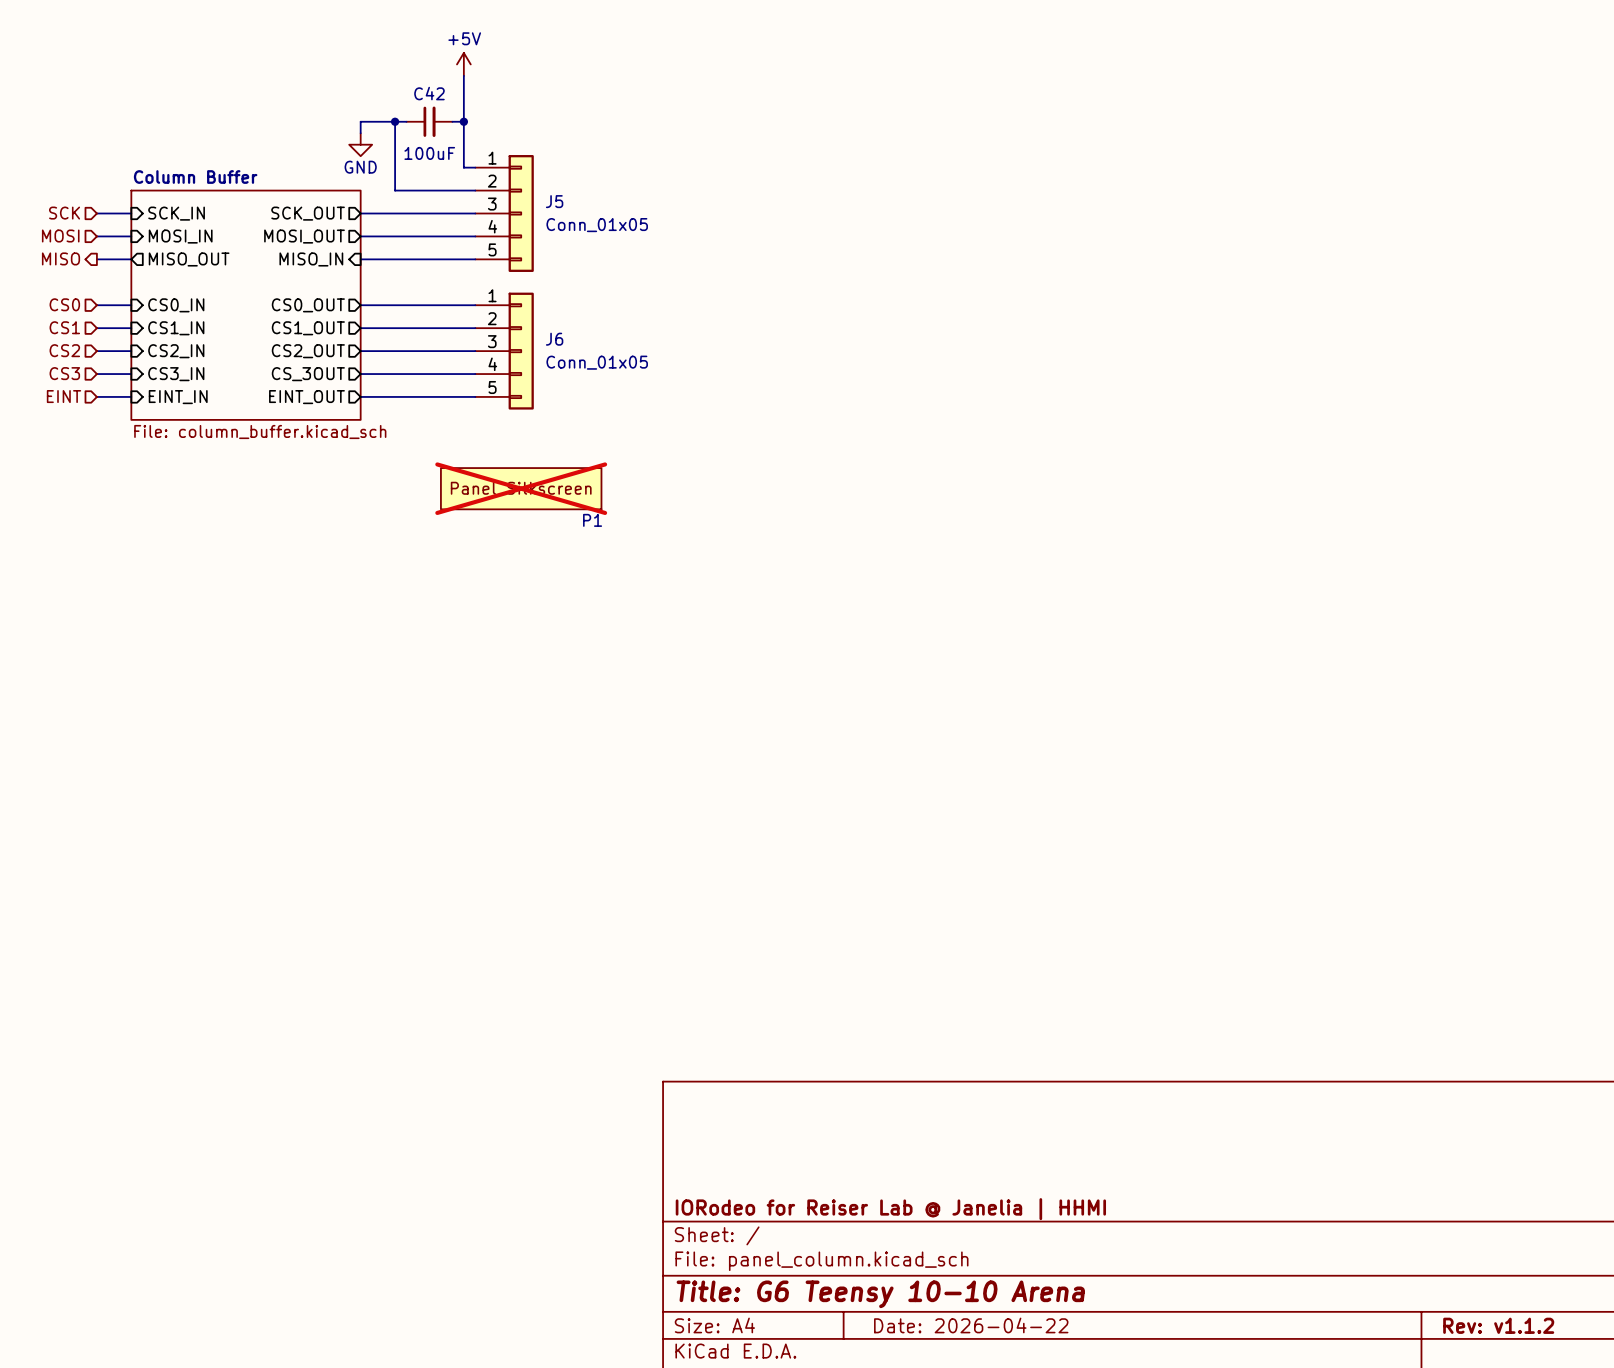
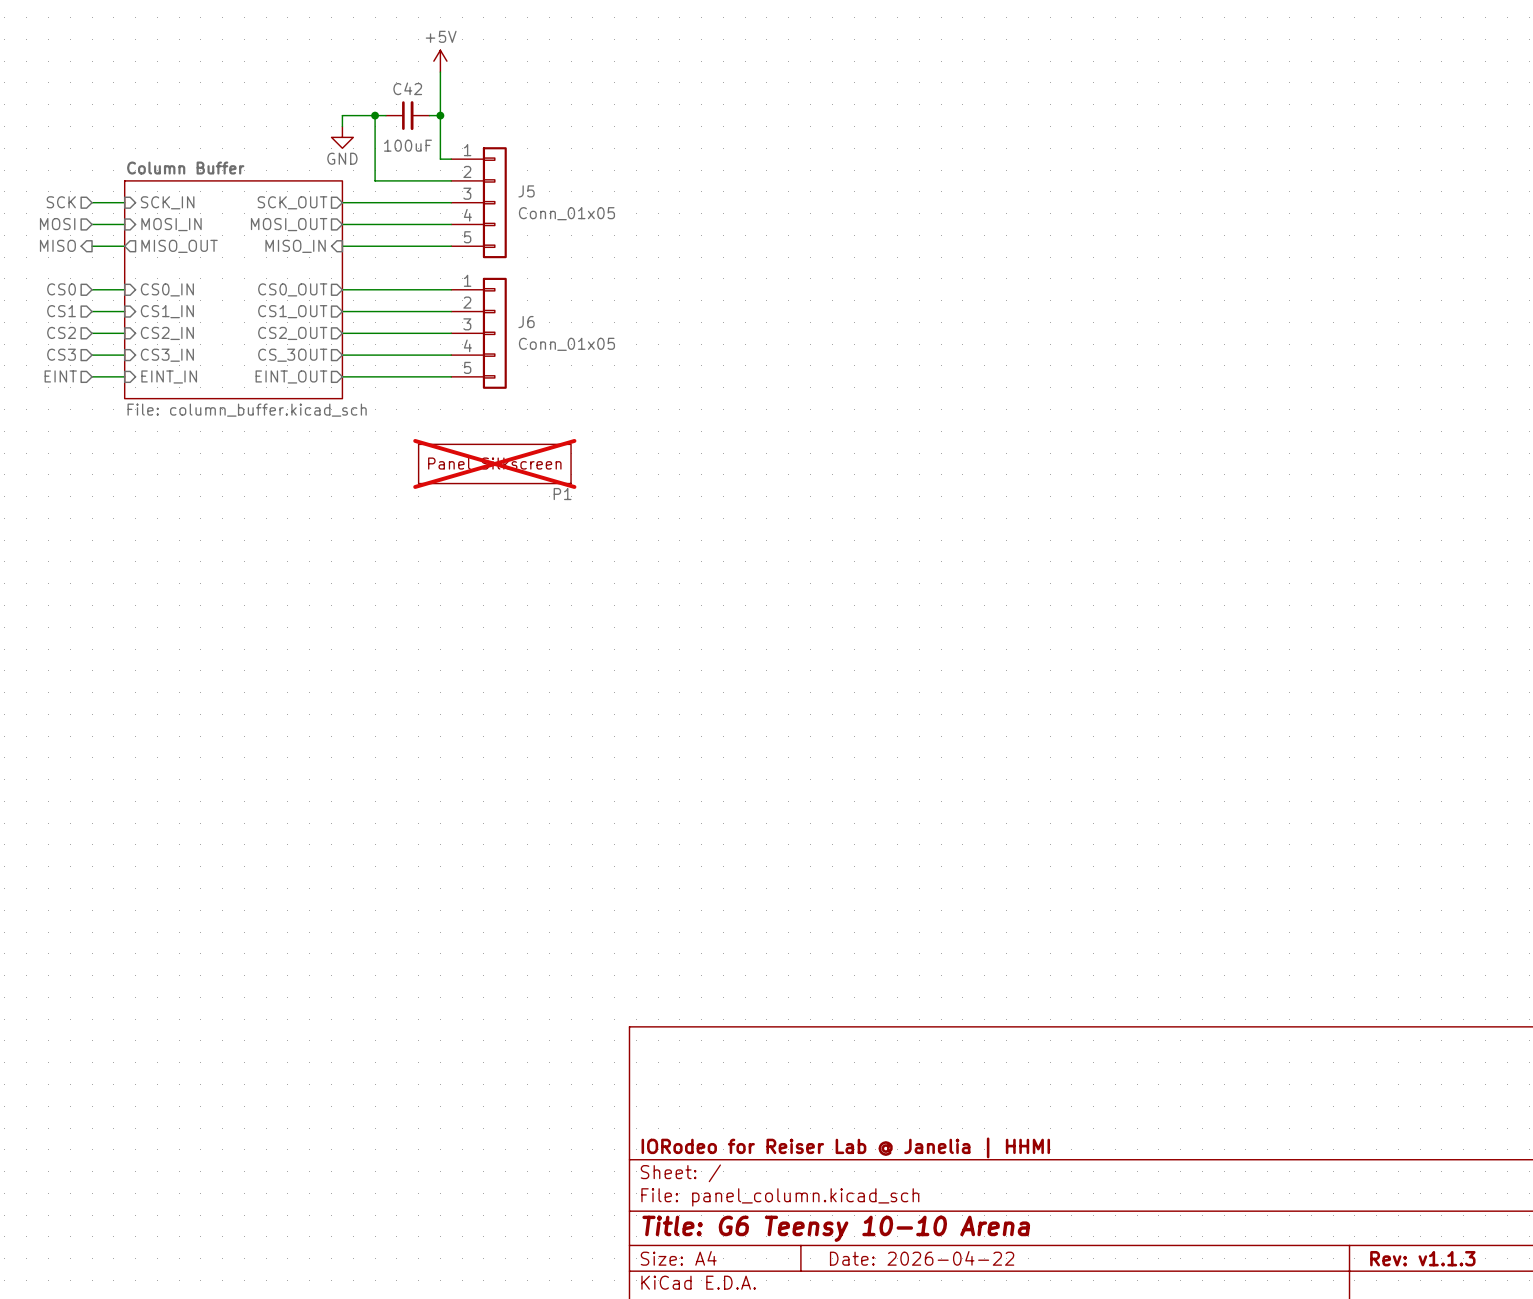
title block: Rev: v1.1.2 (1498, 1325) -> Rev: v1.1.3 (1422, 1258)

